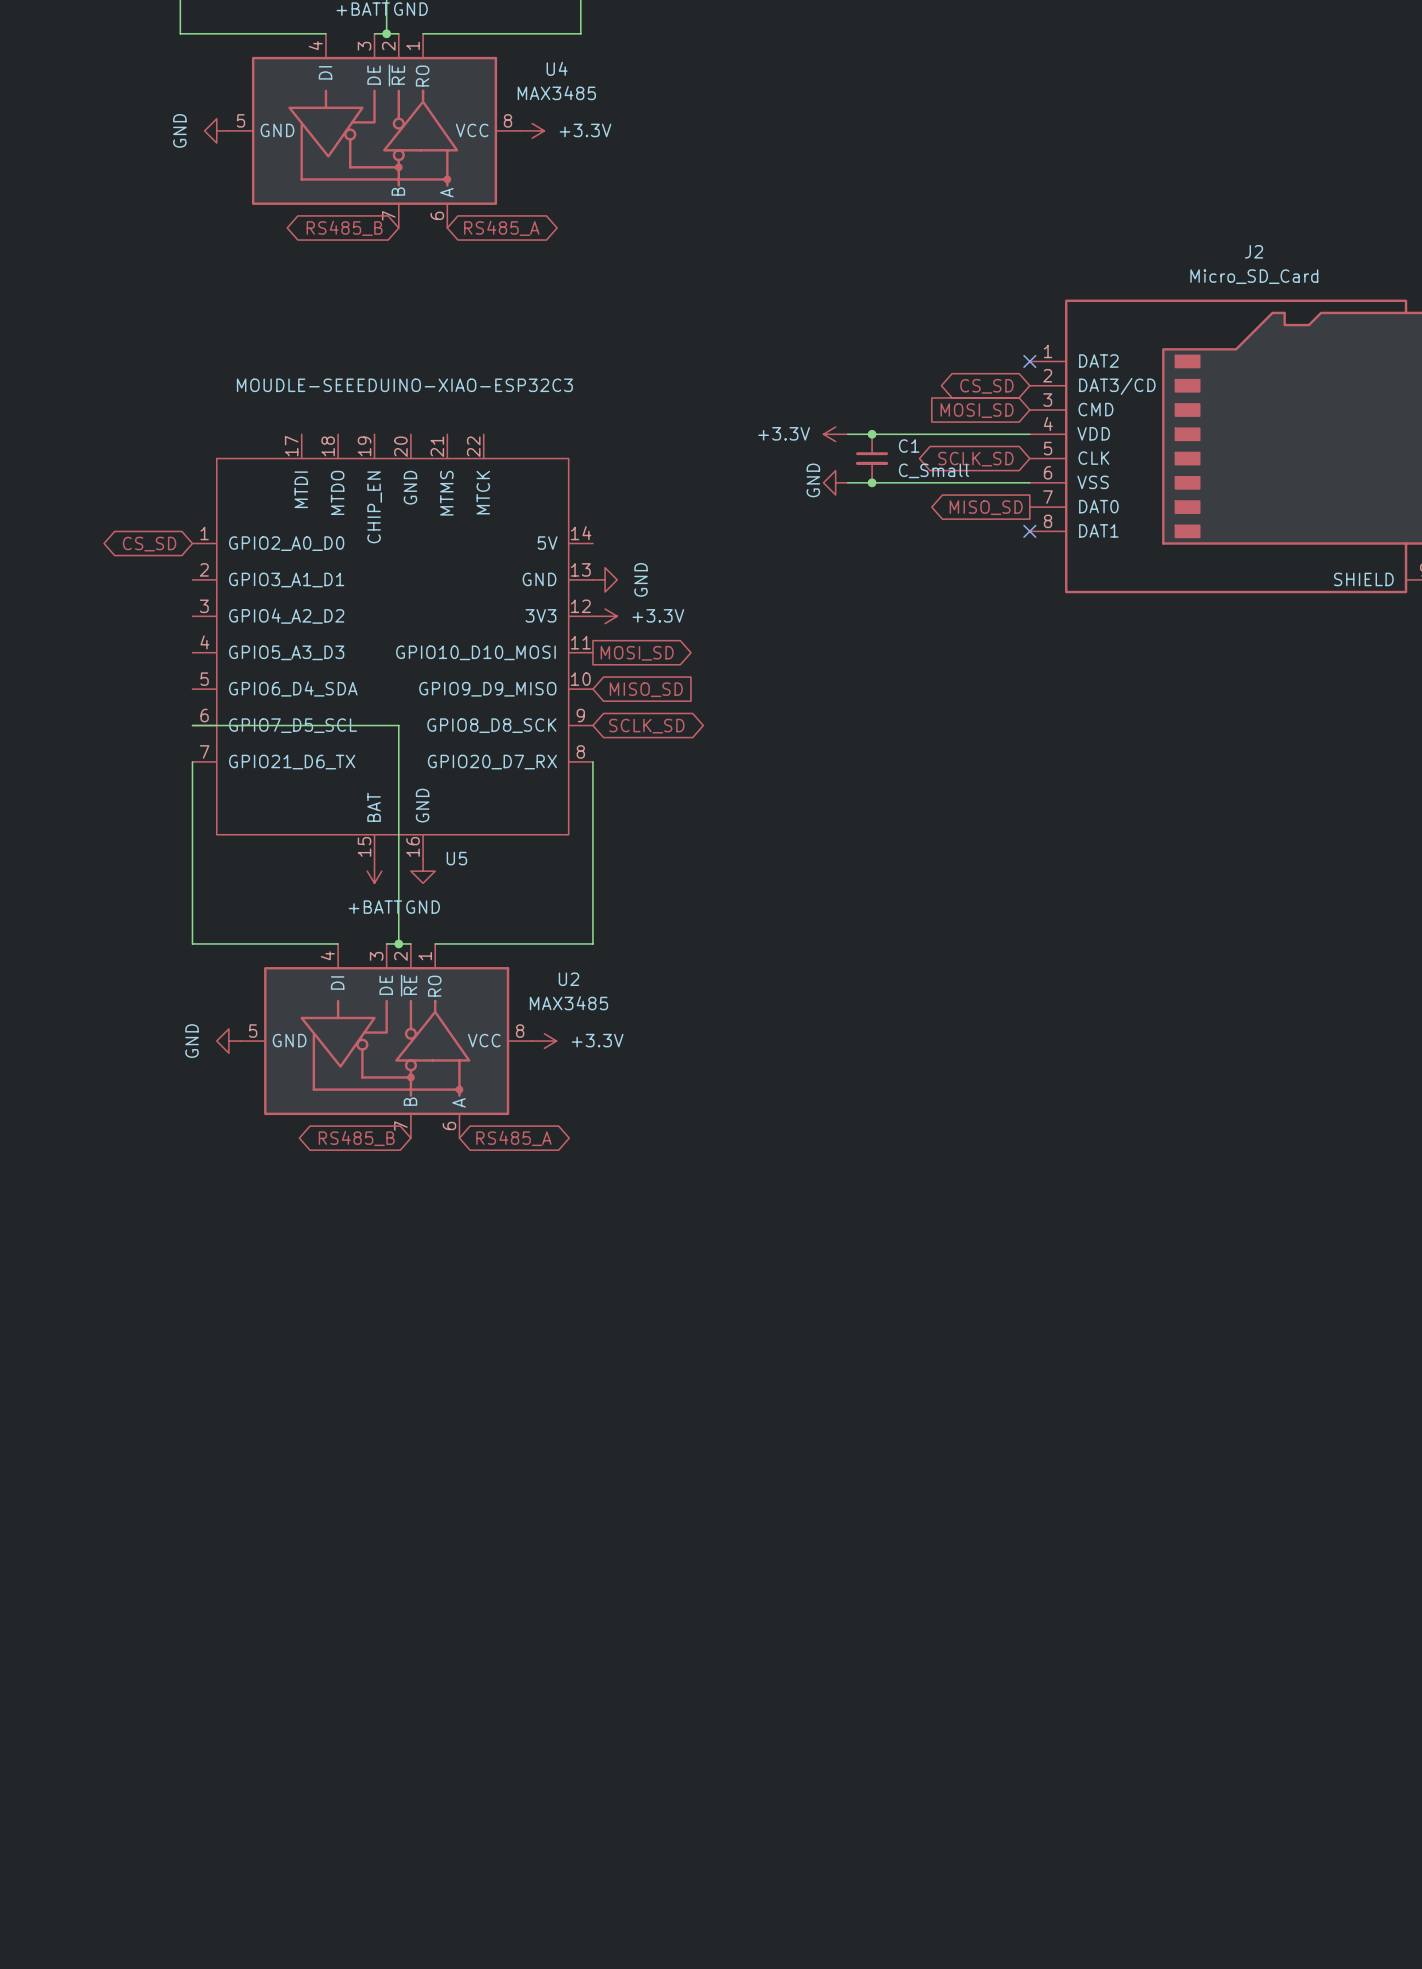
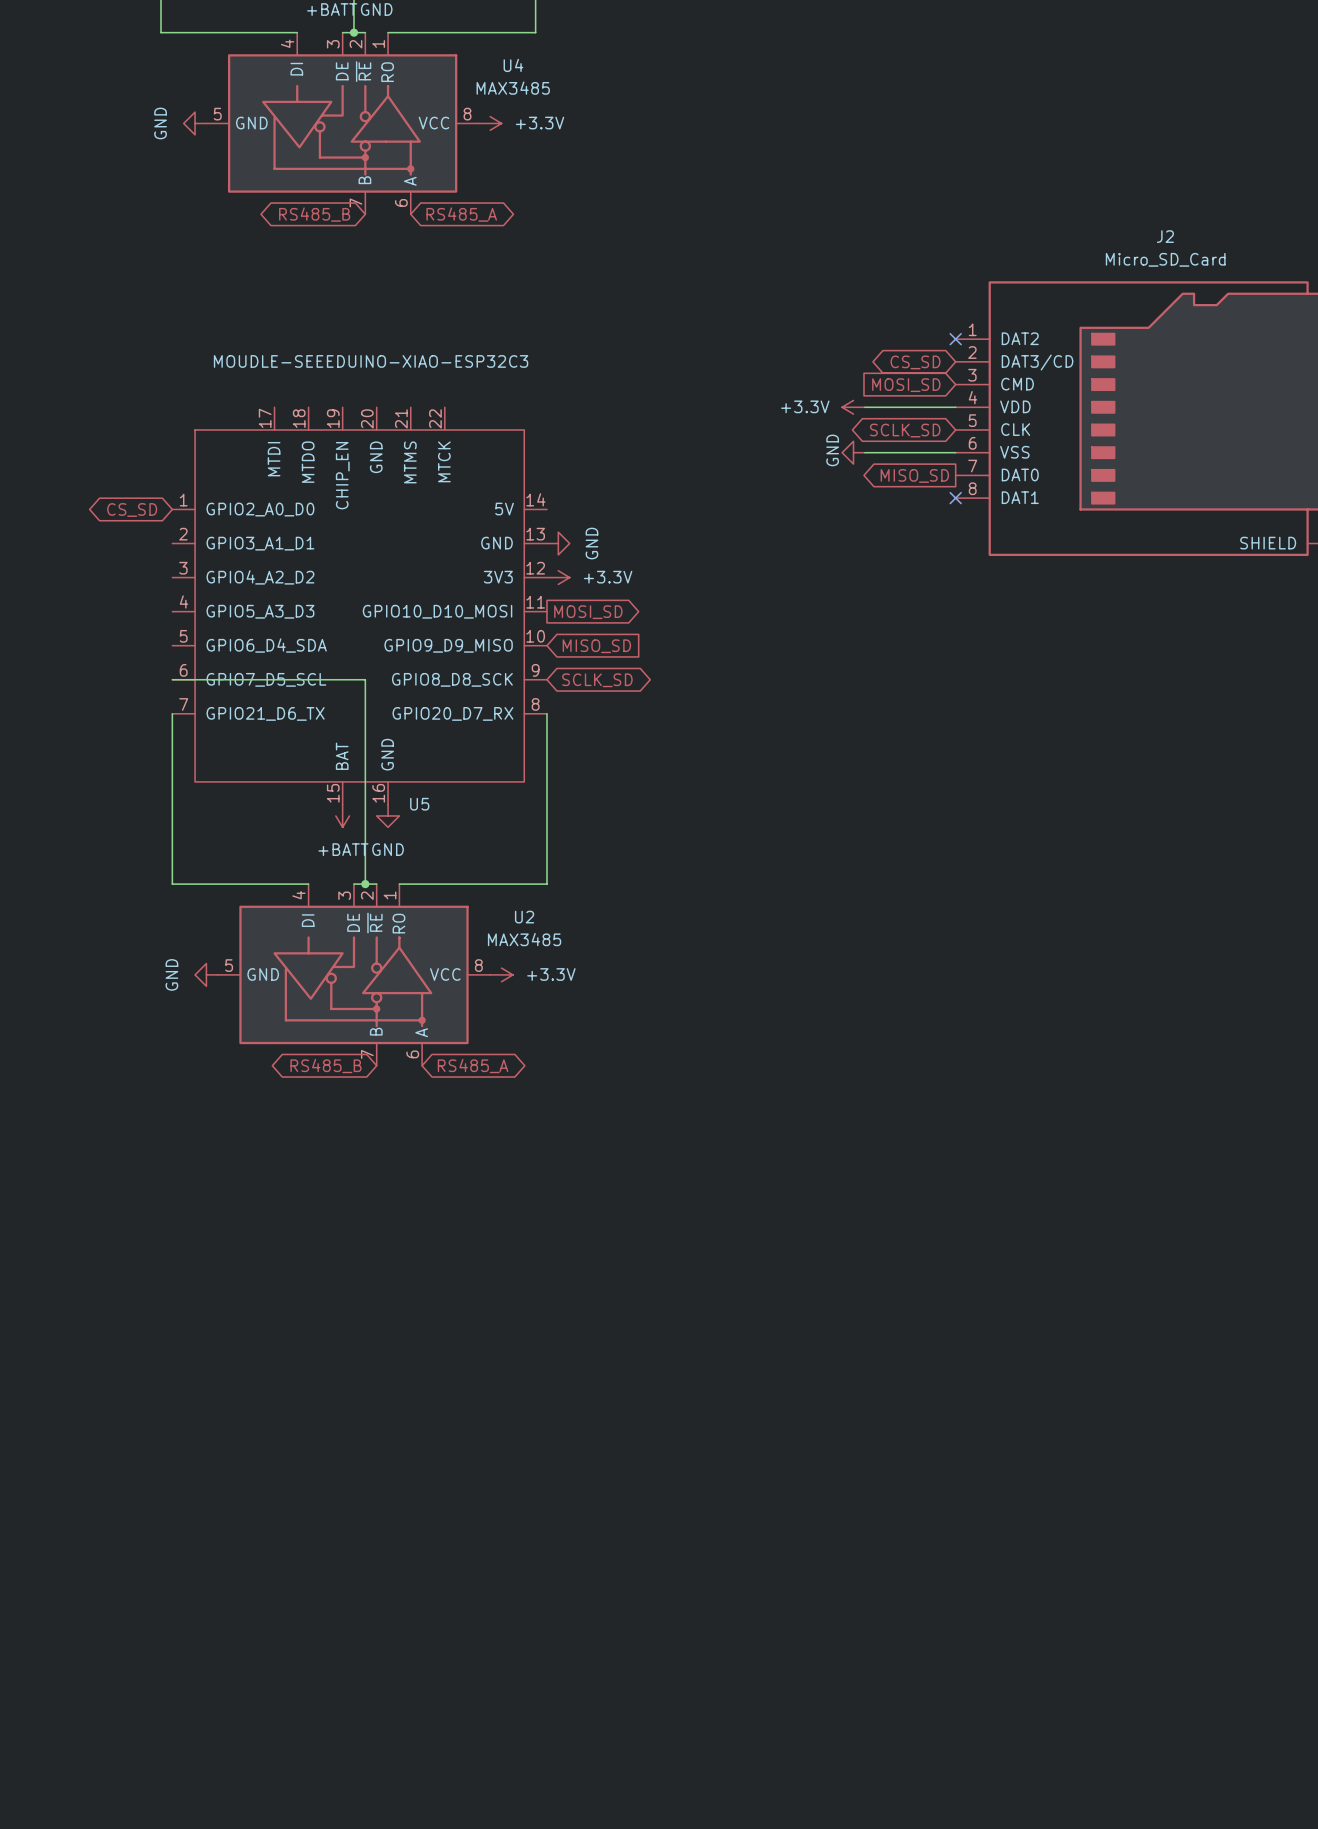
power symbol position: +3.3V (835, 434) -> +3.3V (853, 407)
wire: (847, 434) (932, 434) -> none
junction: (872, 434) -> none
C1: C_Small (872, 458) -> none
power symbol position: GND (835, 482) -> GND (853, 452)
wire: (847, 482) (932, 482) -> none
junction: (872, 482) -> none

